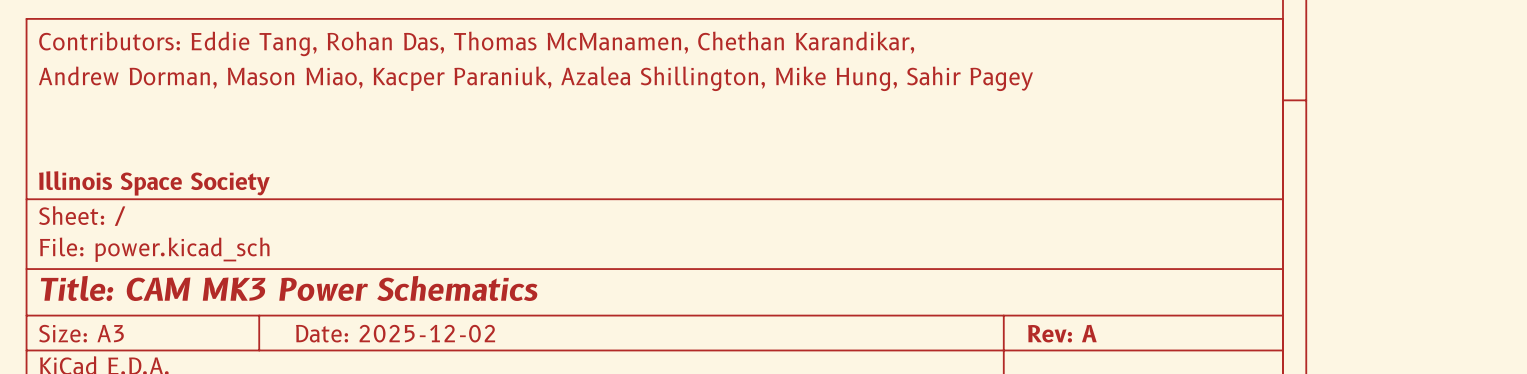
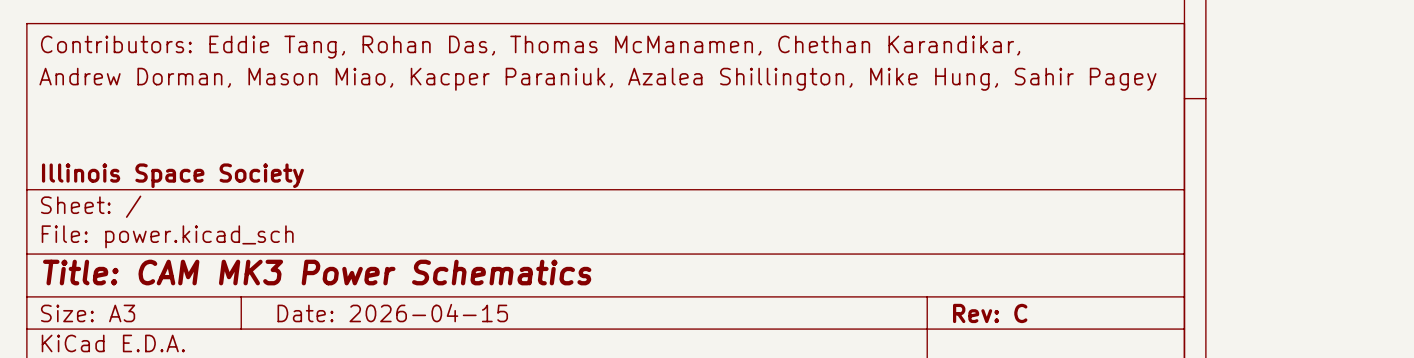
title block: Date: 2025-12-02 (395, 333) -> Date: 2026-04-15 (392, 313)
title block: Rev: A (1062, 333) -> Rev: C (990, 313)

